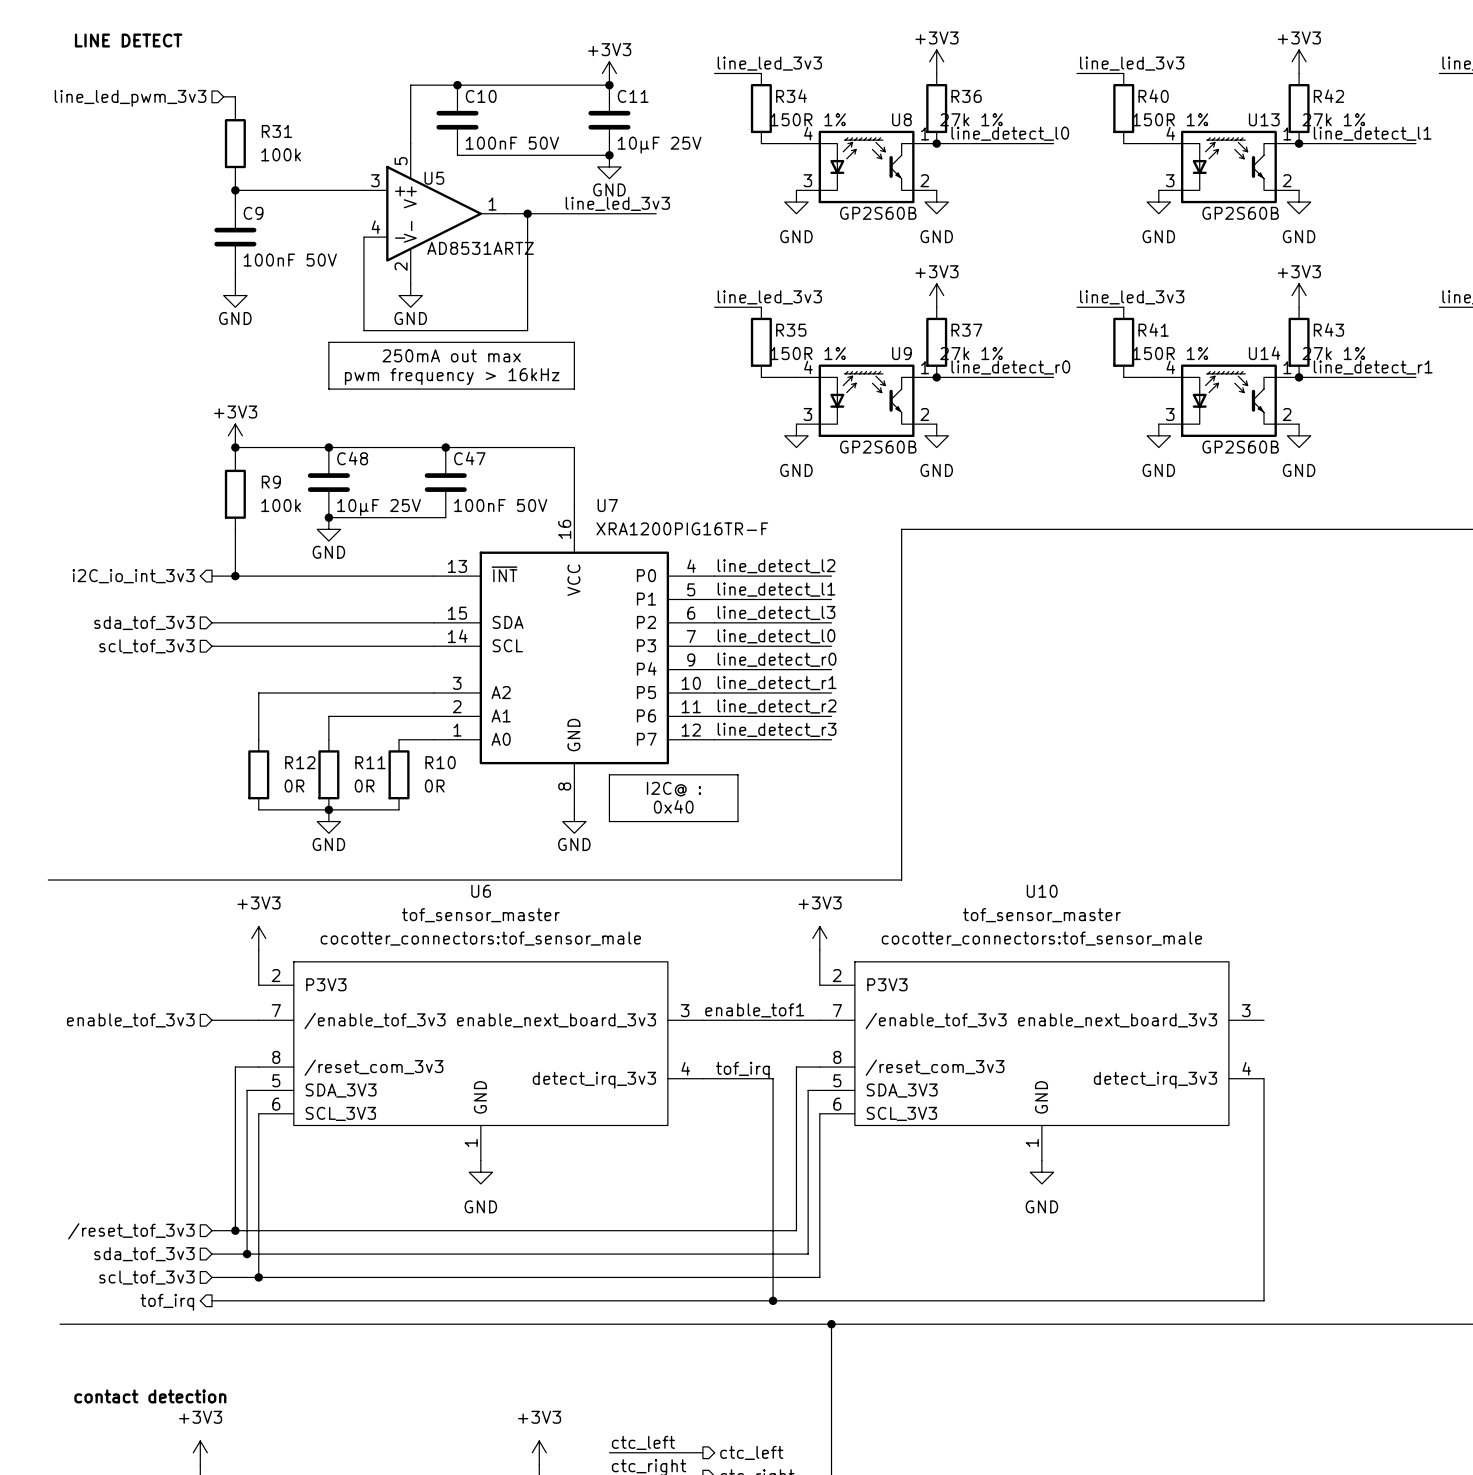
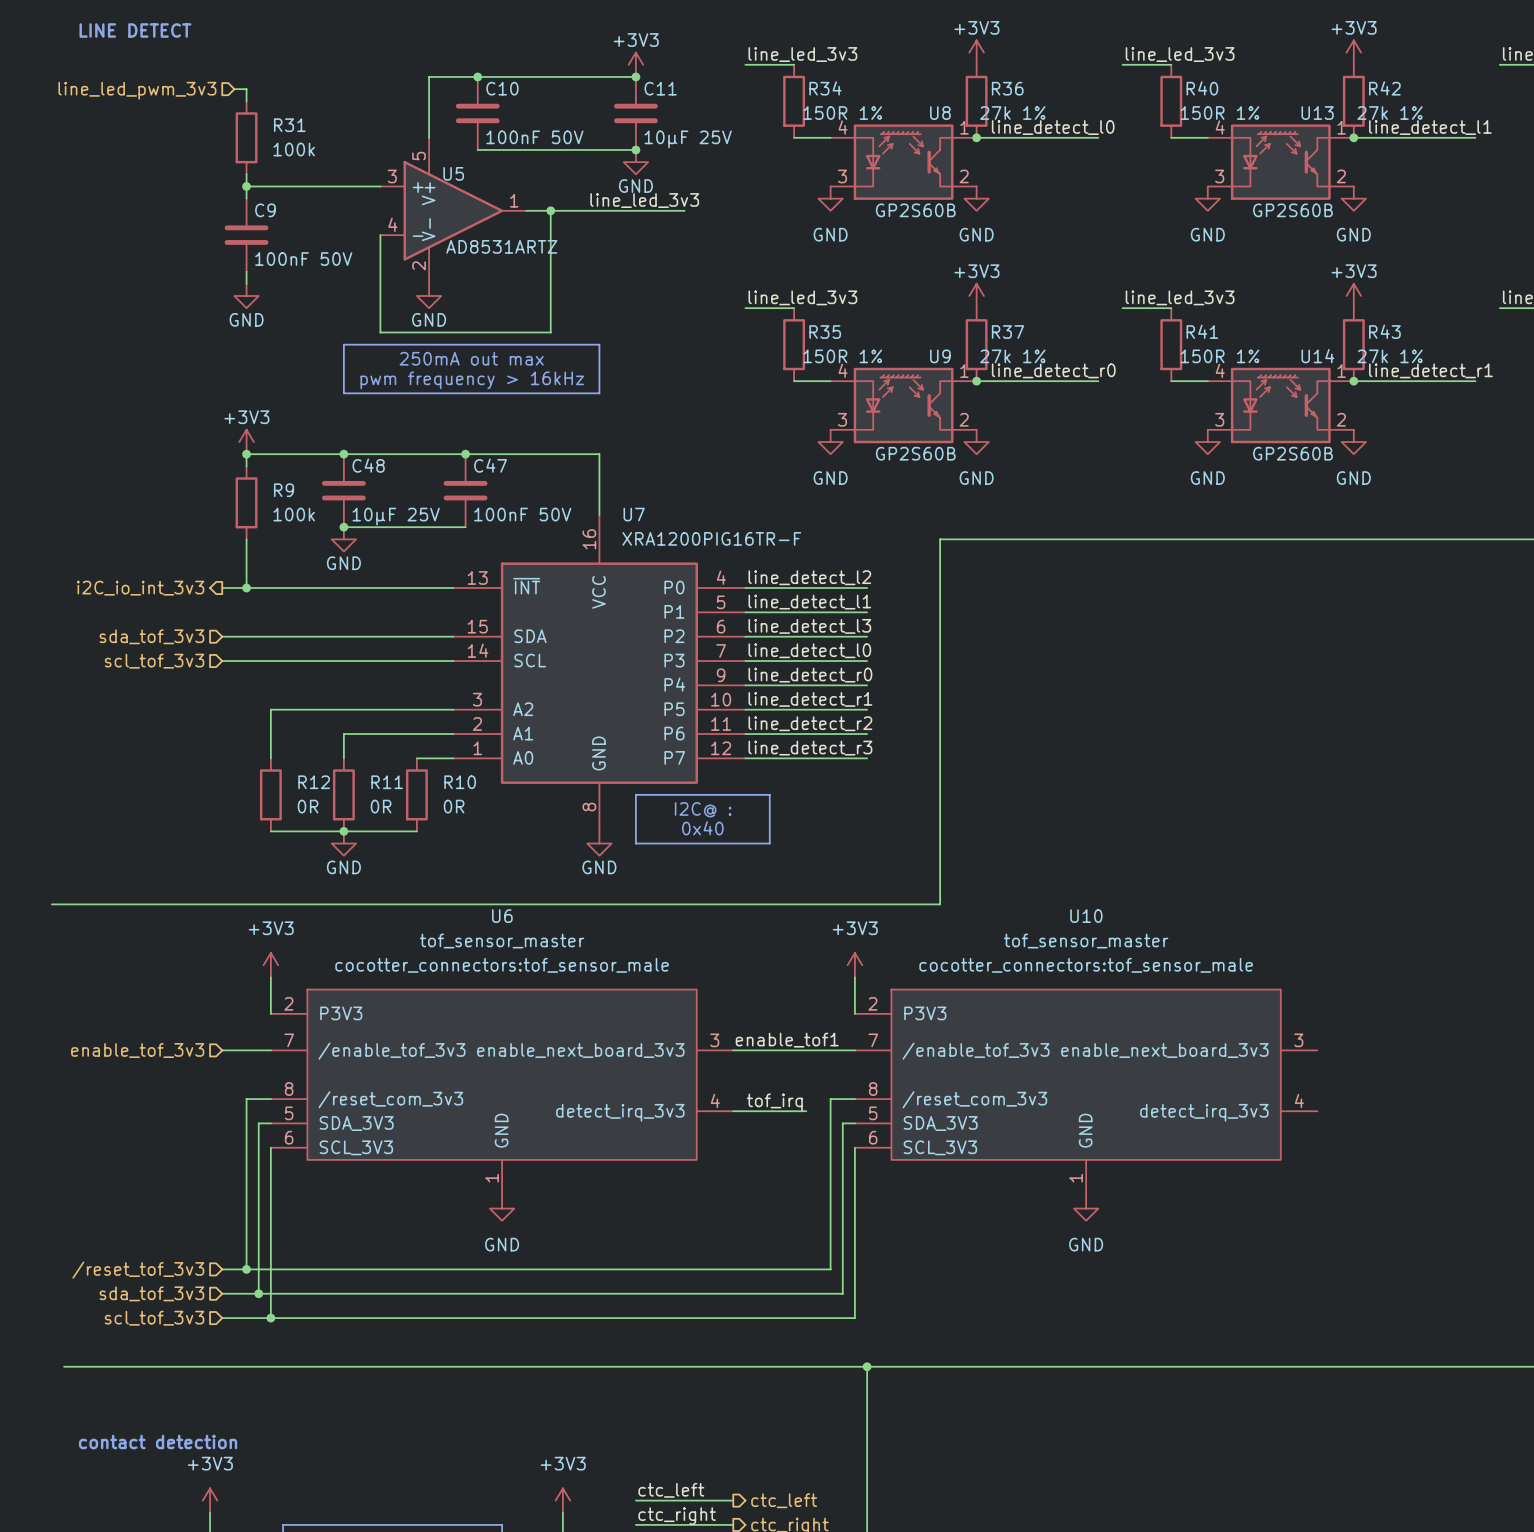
wire: (773, 1078) (773, 1300) -> none
wire: (1264, 1078) (1264, 1300) (212, 1300) -> none
junction: (773, 1300) -> none
hierarchical label: tof_irq (167, 1302) -> none

